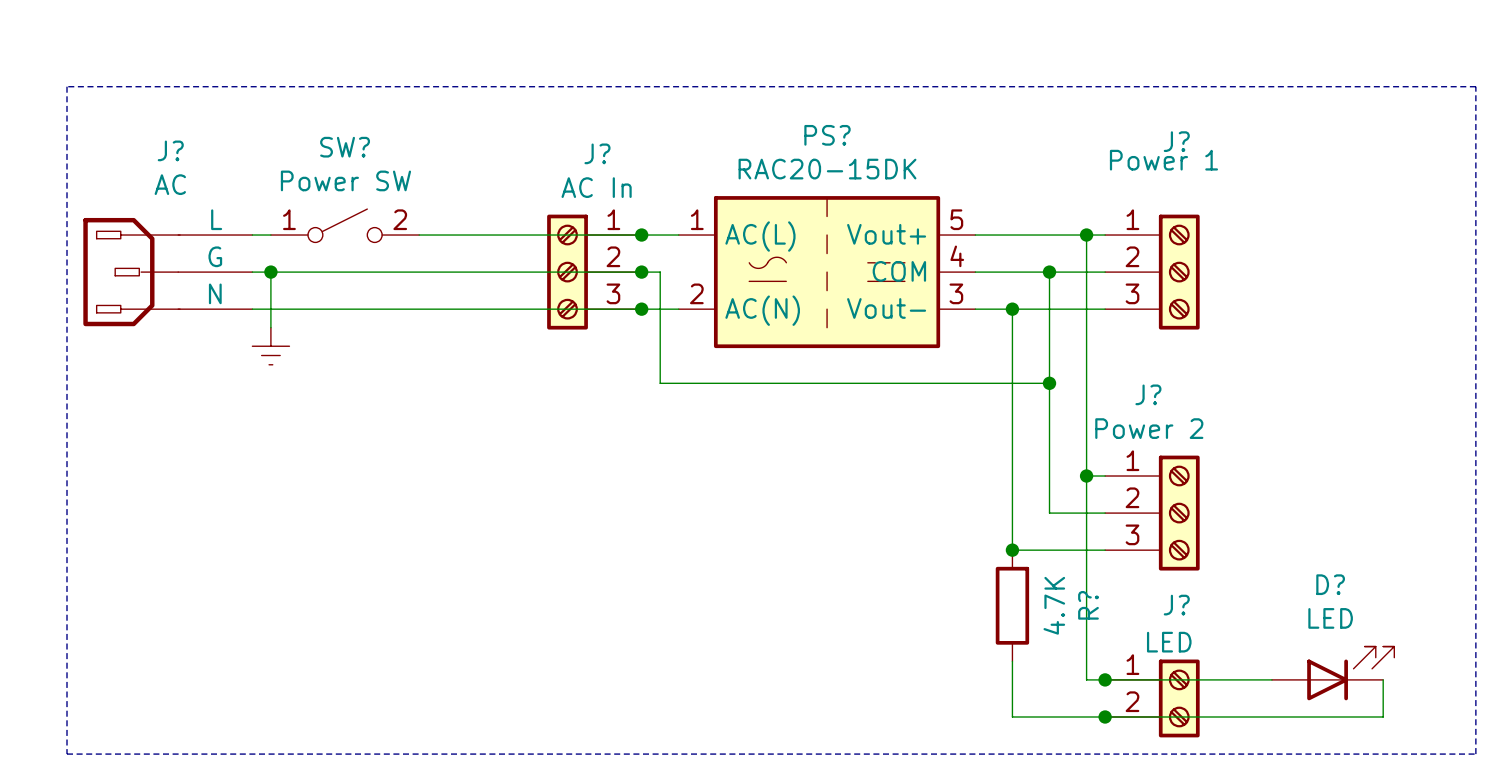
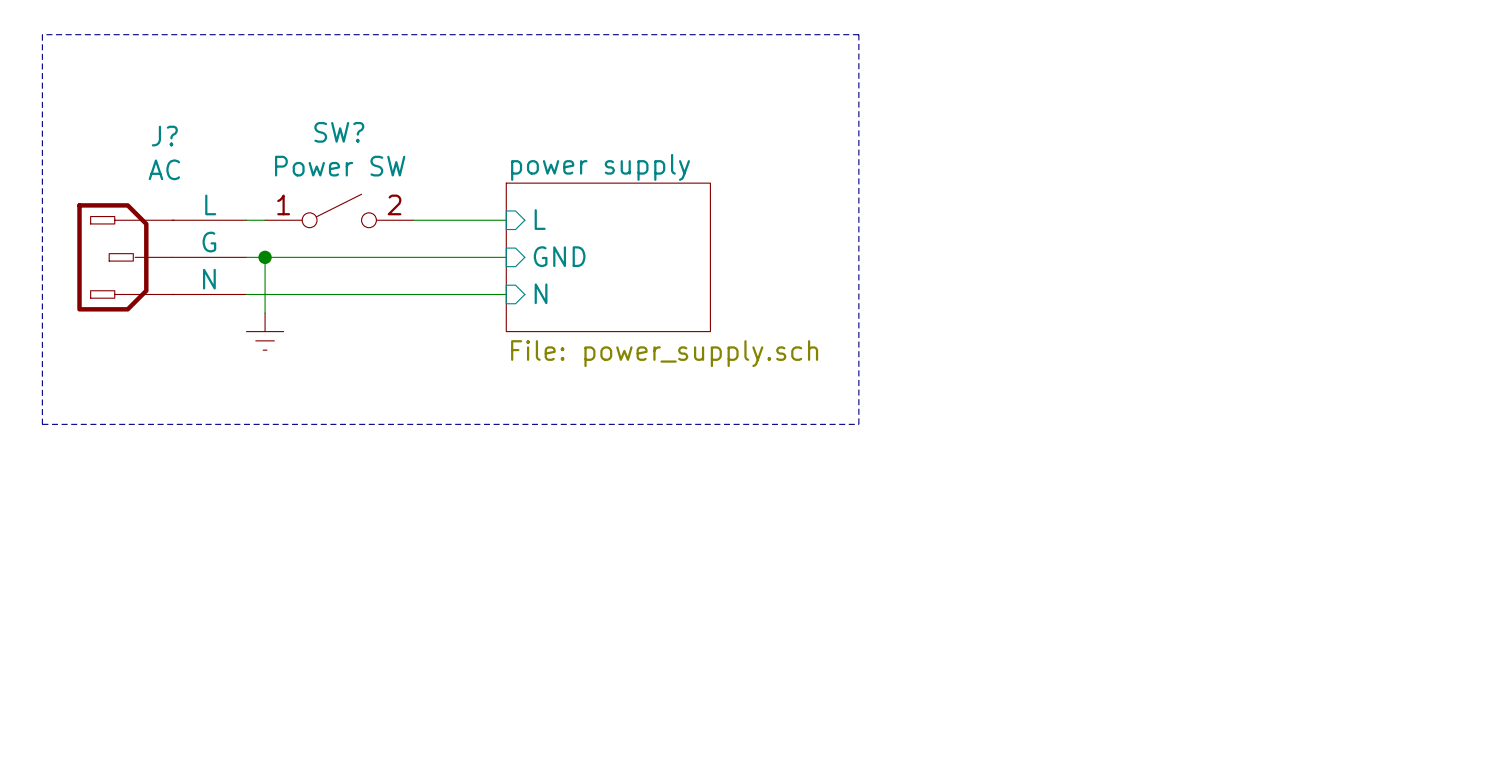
line: none -> (42, 34) (858, 34) (858, 424) (42, 424) (42, 34)
line: (67, 86) (67, 754) (1475, 754) (1475, 86) (67, 86) -> none
sheet pin: none -> L (540, 219)
wire: (511, 235) (678, 235) -> none
junction: (641, 235) -> none
wire: (975, 235) (1105, 235) -> none
wire: (1086, 235) (1086, 679) (1271, 679) -> none
junction: (1086, 235) -> none
sheet pin: none -> GND (559, 256)
wire: (511, 272) (660, 272) (660, 383) (1049, 383) -> none
J?: AC In (594, 272) -> none
sheet power supply: none -> File: power_supply.sch (608, 257)
junction: (641, 272) -> none
PS?: RAC20-15DK (827, 272) -> none
wire: (975, 272) (1105, 272) -> none
wire: (1049, 272) (1049, 513) (1105, 513) -> none
junction: (1049, 272) -> none
J?: Power 1 (1152, 272) -> none
sheet pin: none -> N (541, 293)
wire: (511, 309) (678, 309) -> none
junction: (641, 309) -> none
wire: (975, 309) (1105, 309) -> none
wire: (1012, 309) (1012, 550) (1105, 550) -> none
junction: (1012, 309) -> none
junction: (1049, 383) -> none
wire: (1086, 476) (1105, 476) -> none
junction: (1086, 476) -> none
J?: Power 2 (1152, 513) -> none
junction: (1012, 550) -> none
R?: 4.7K (1012, 605) -> none
wire: (1012, 661) (1012, 717) (1383, 717) (1383, 679) -> none
D?: LED (1333, 673) -> none
junction: (1105, 679) -> none
J?: LED (1152, 698) -> none
junction: (1105, 717) -> none

